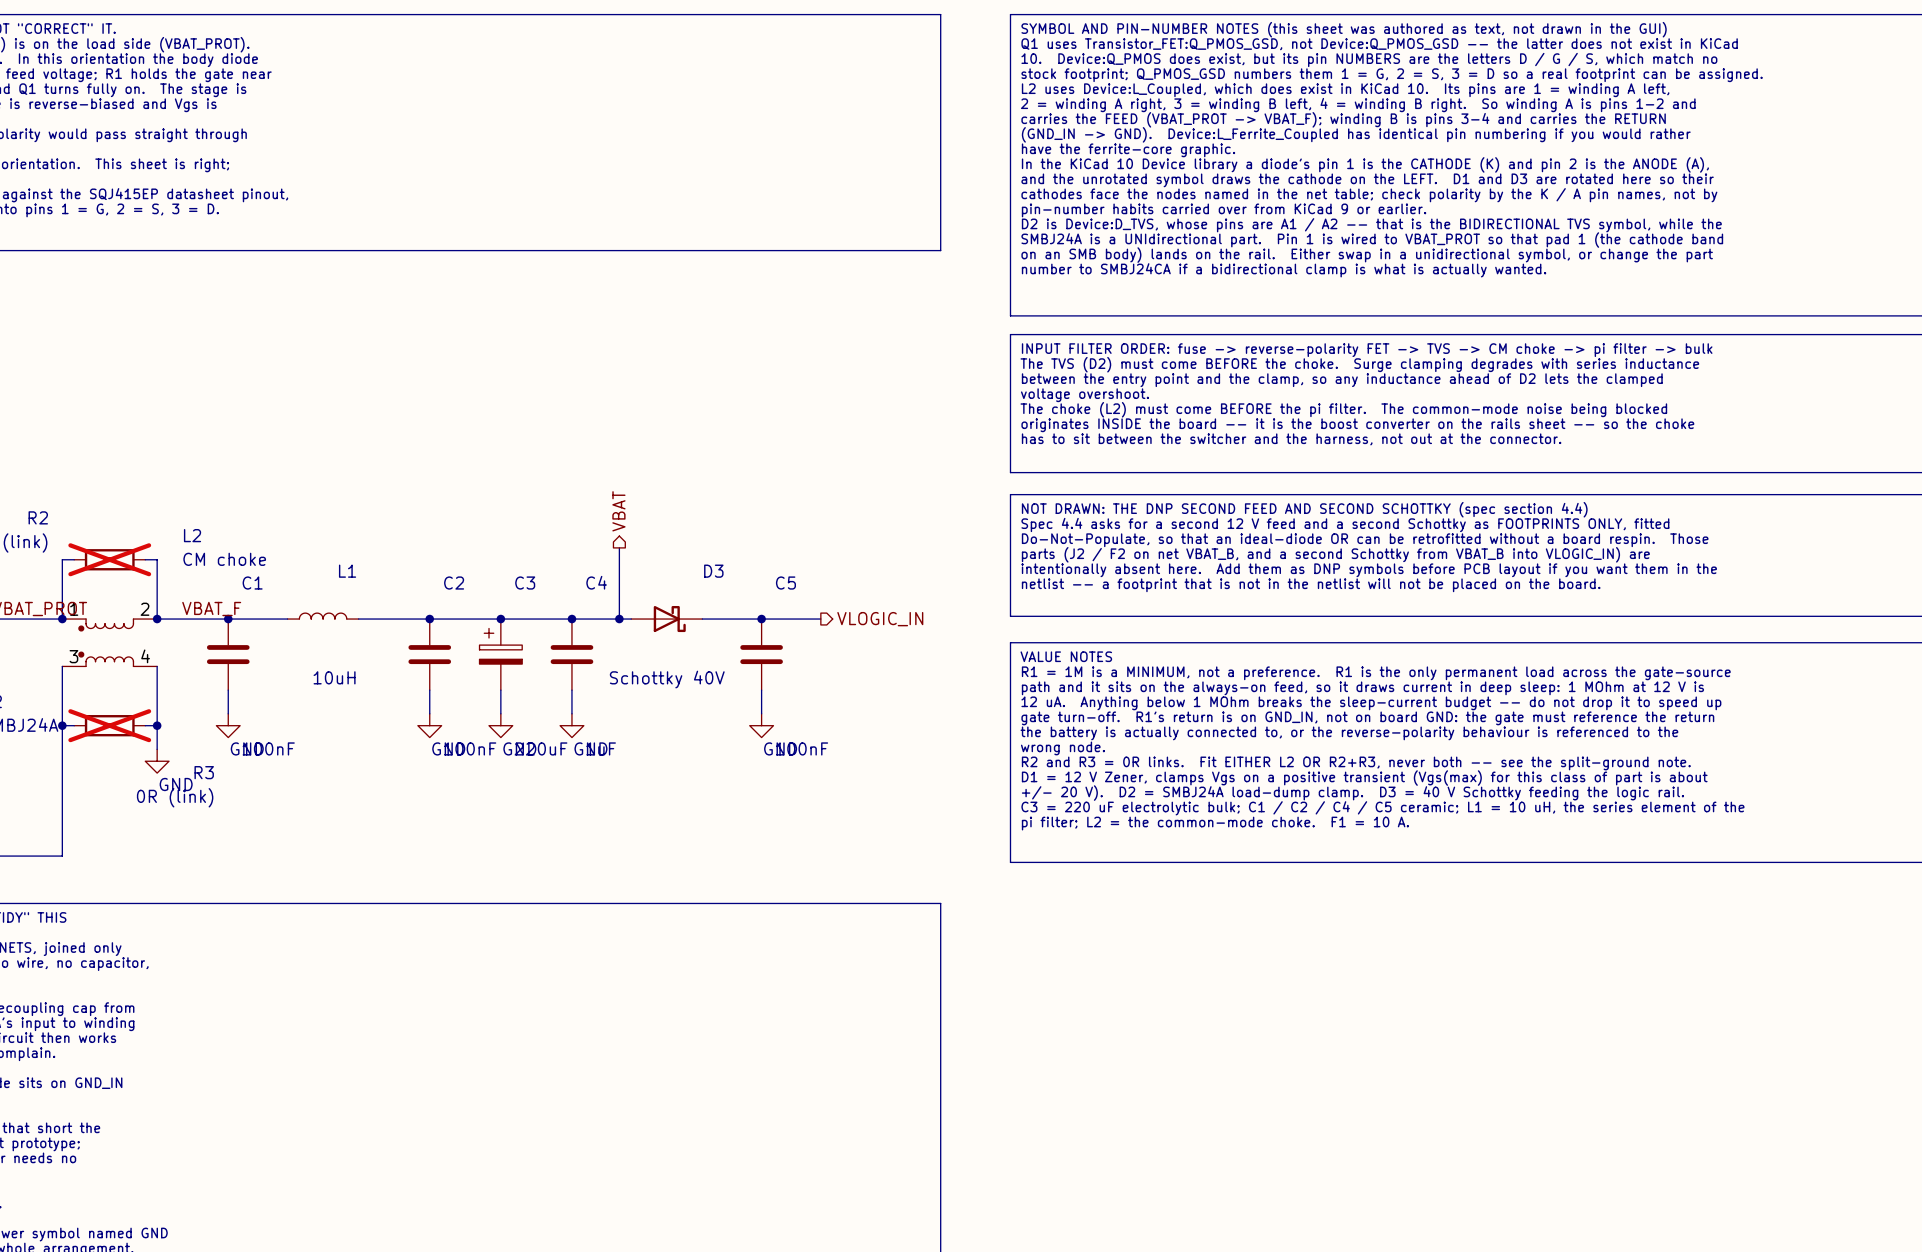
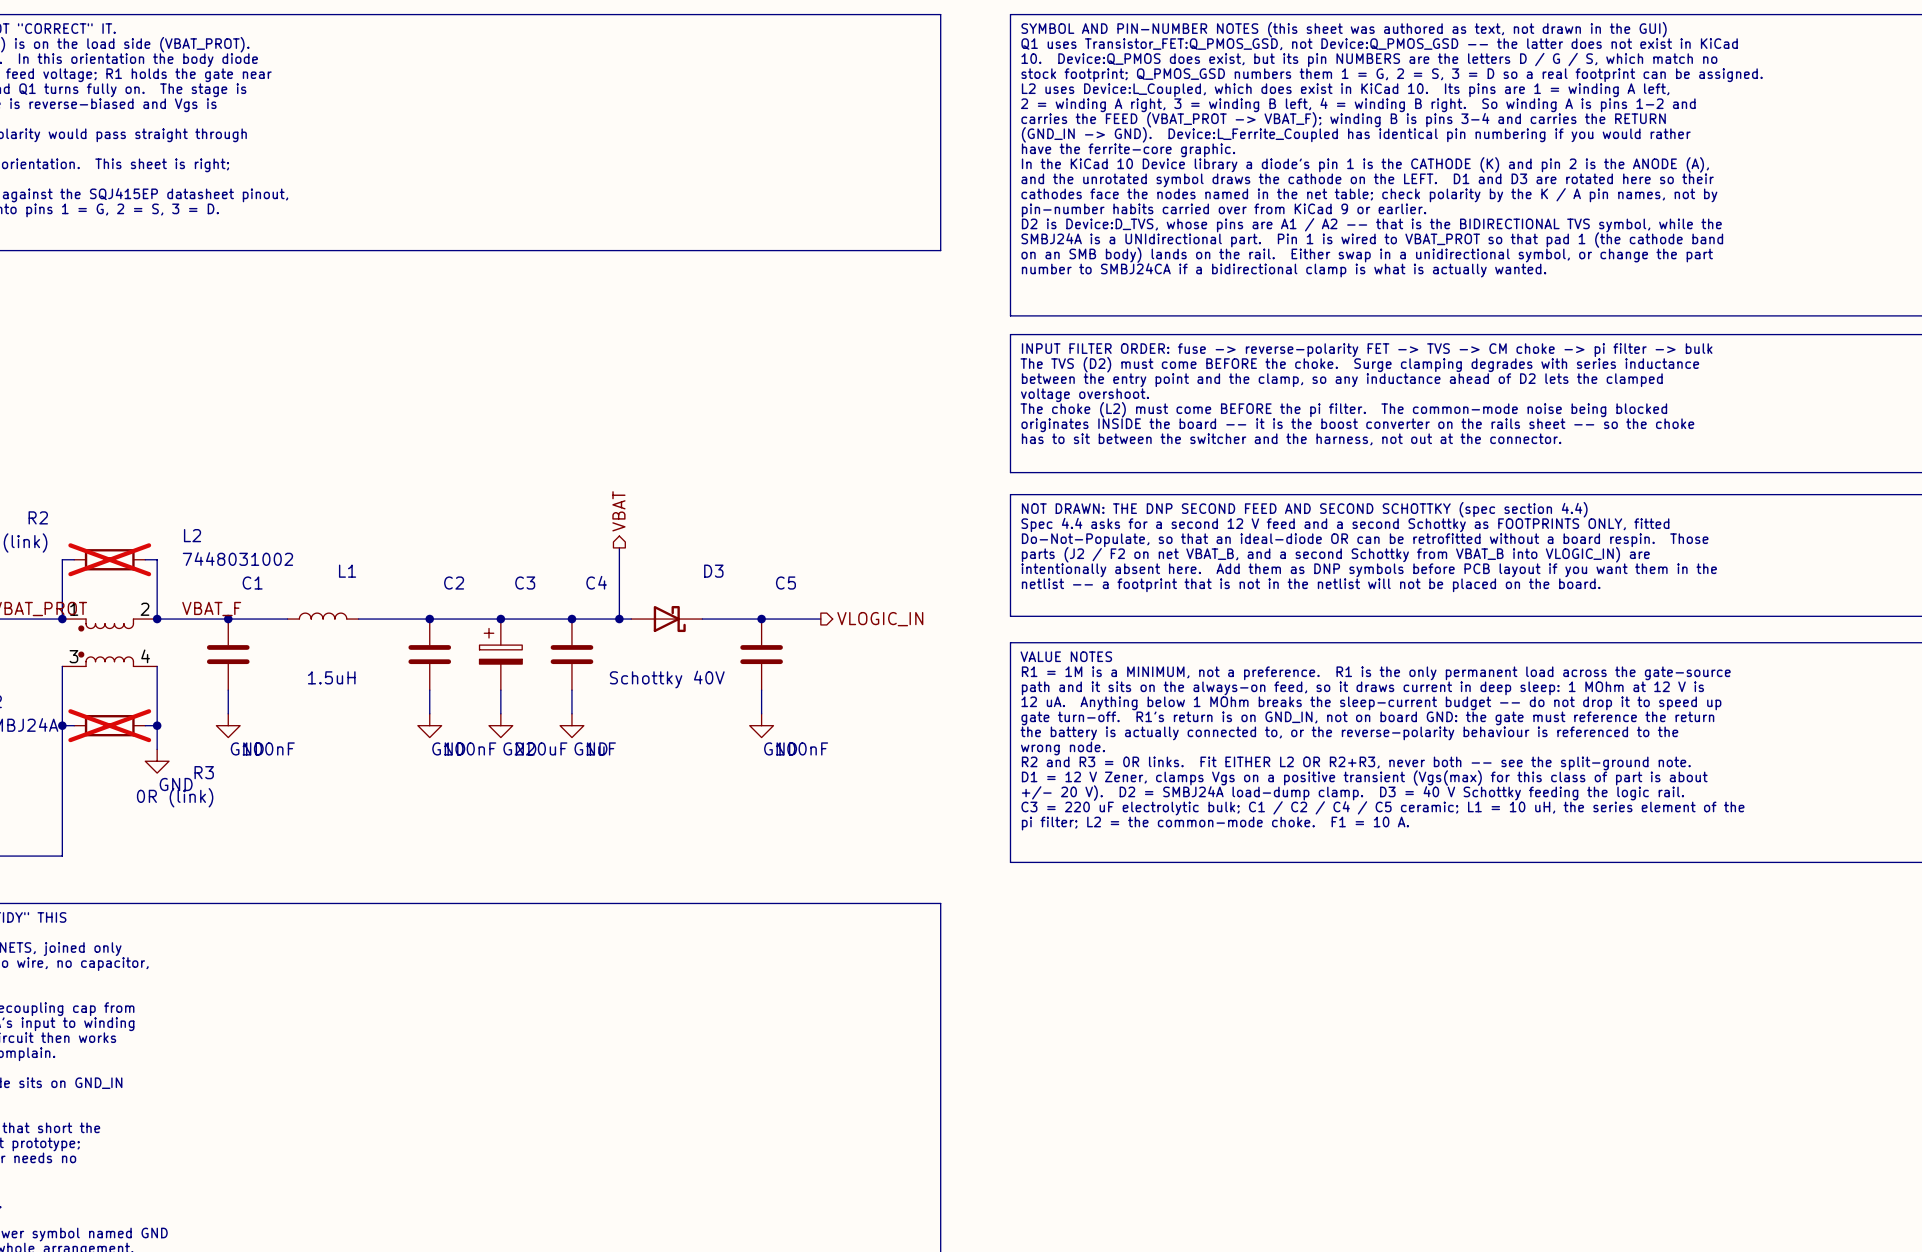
L2 value: CM choke (224, 559) -> 7448031002 (237, 559)
L1 value: 10uH (334, 677) -> 1.5uH (331, 677)

